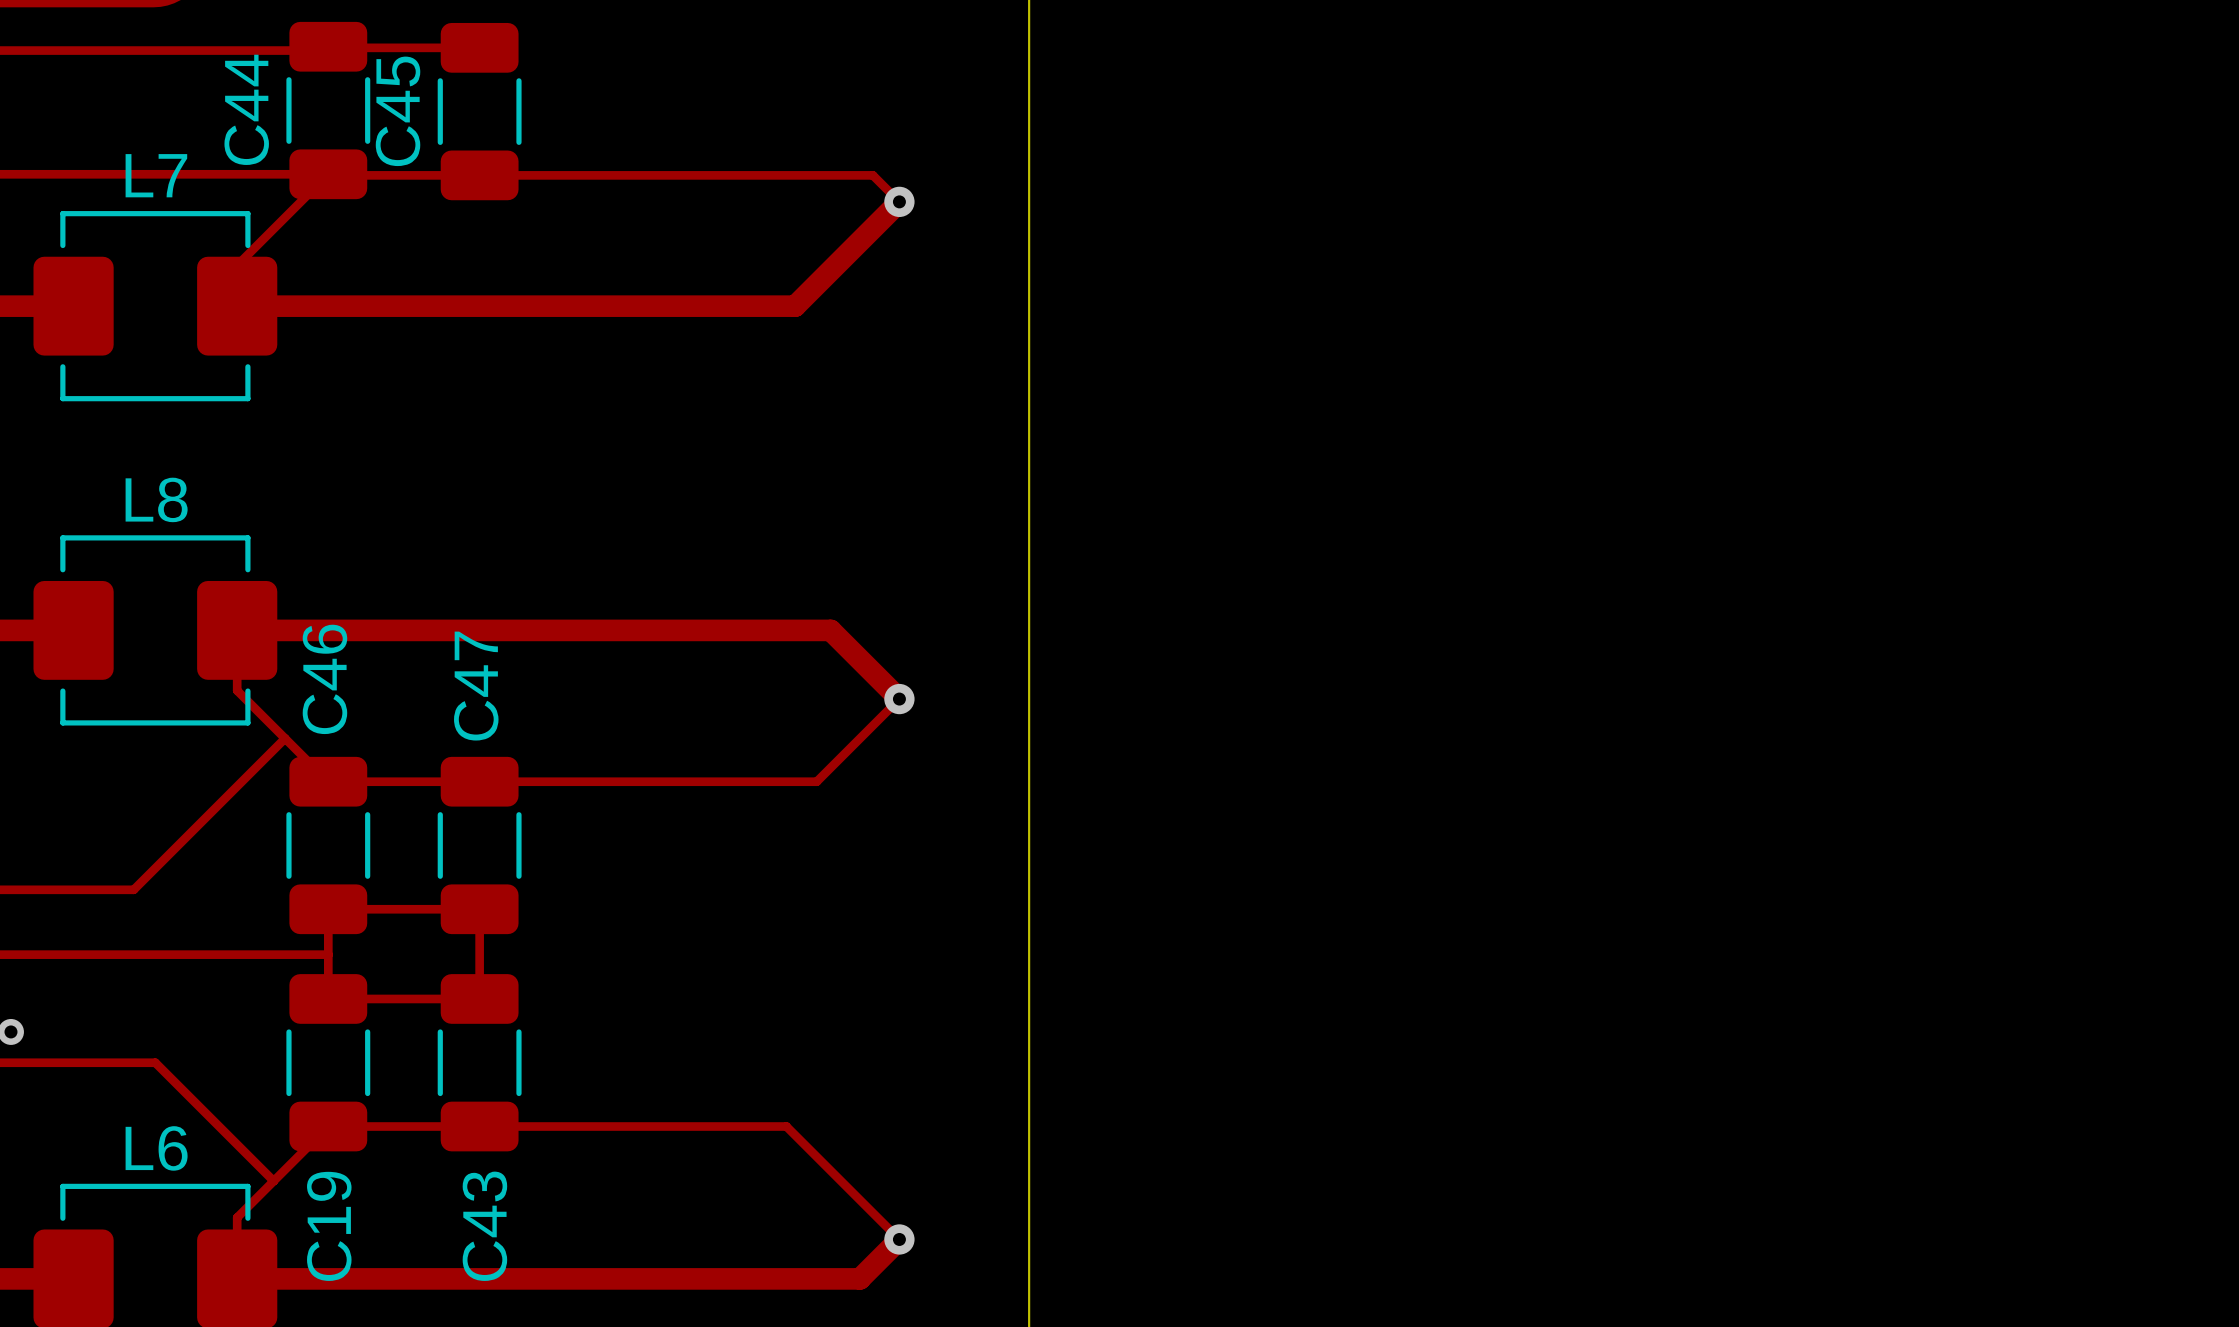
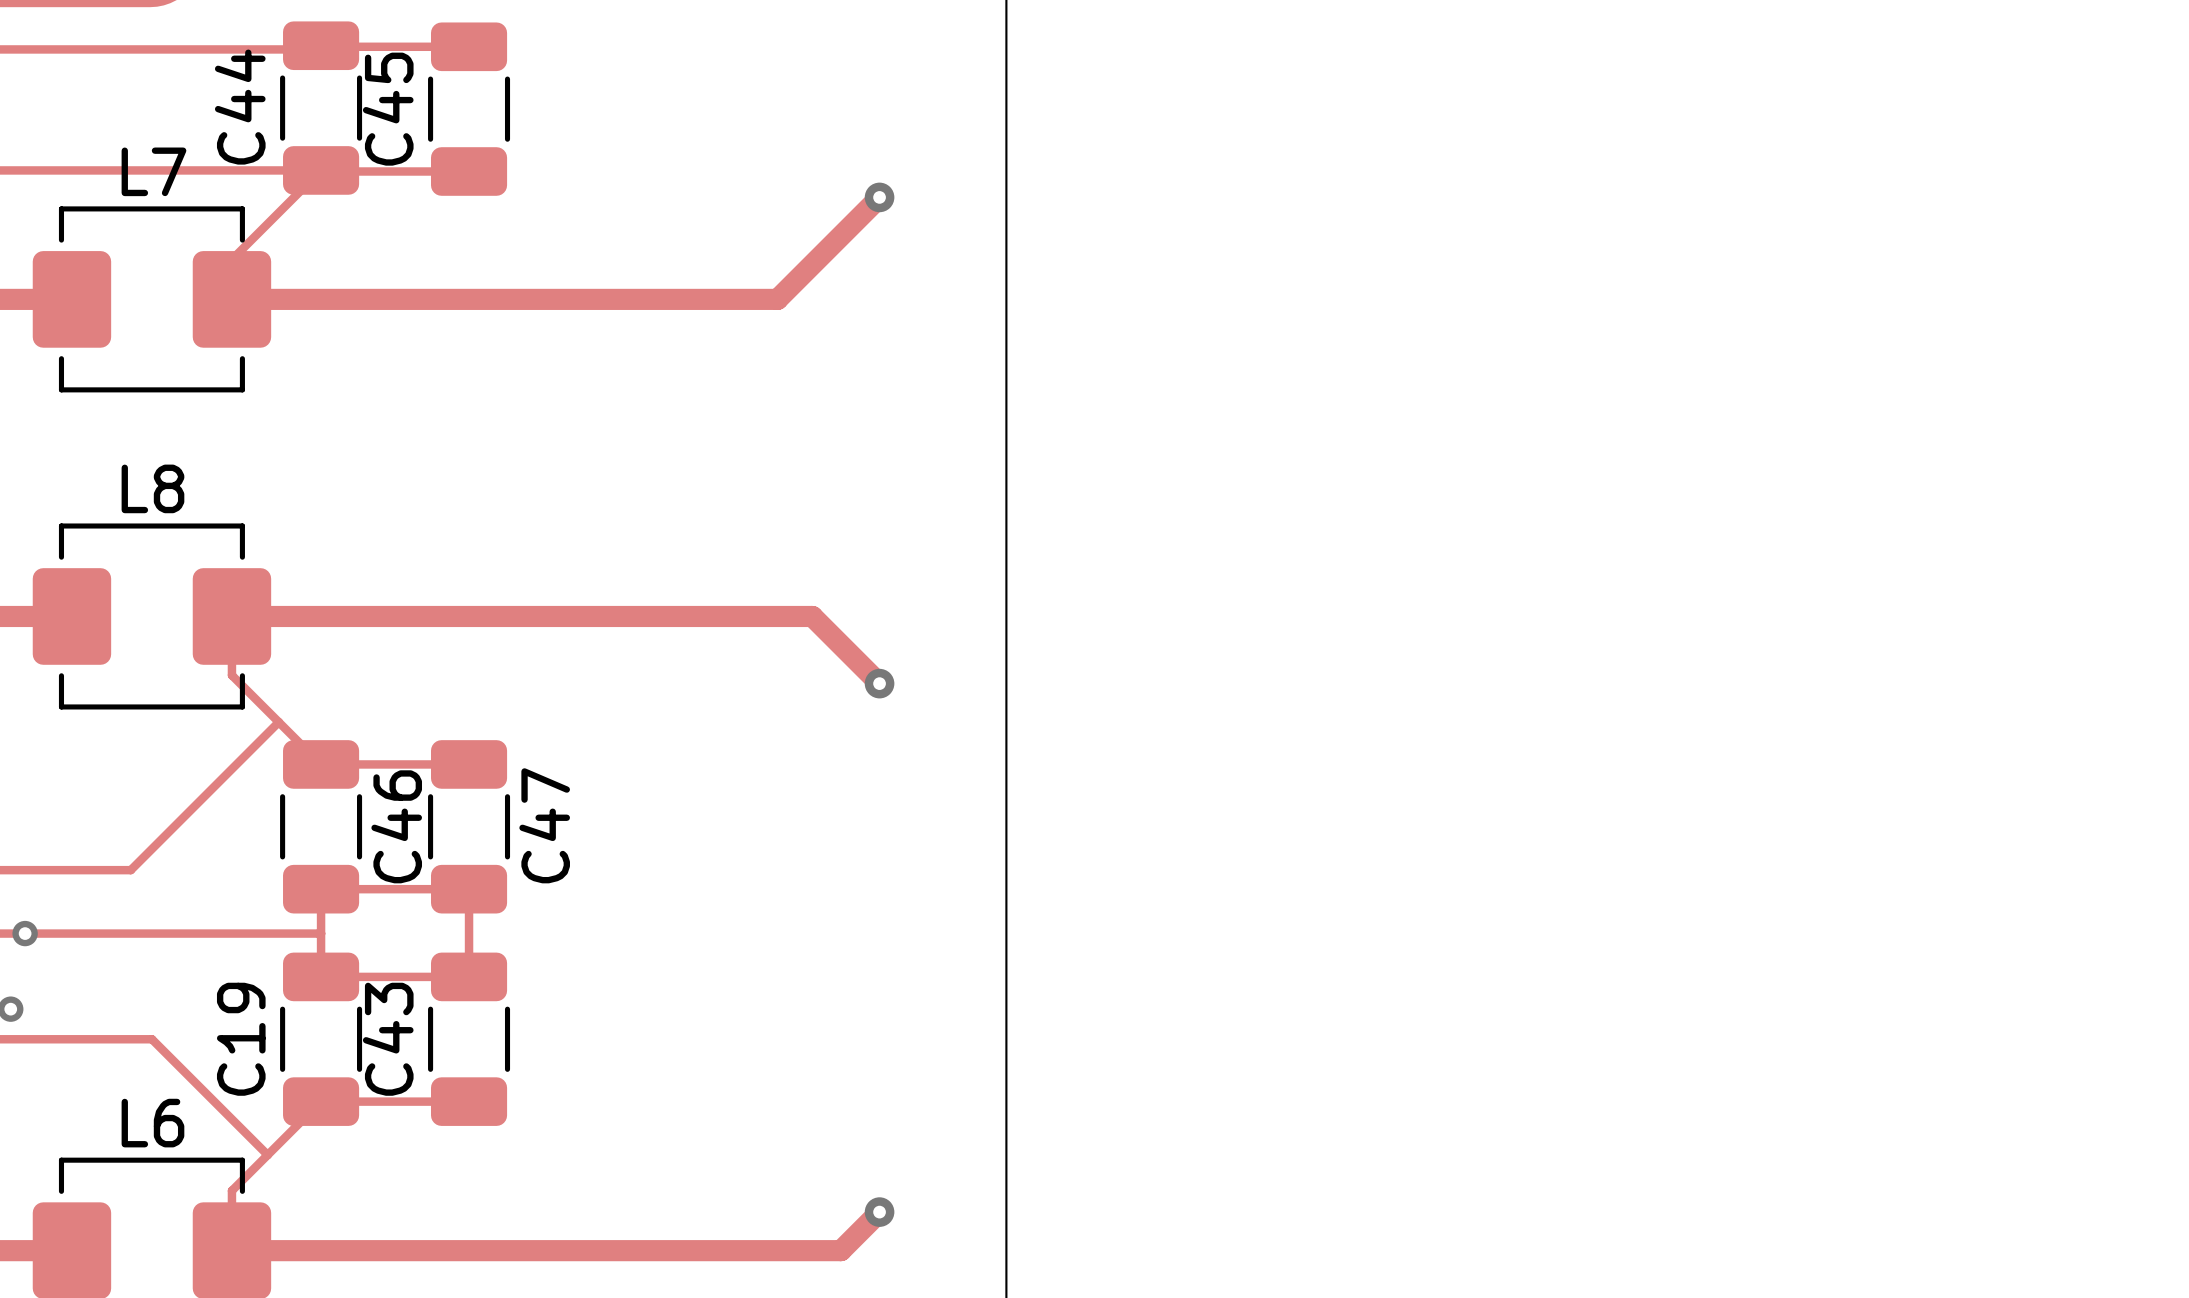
track: (485, 175) (872, 175) (899, 201) -> none
C46 name position: C46 (324, 679) -> C46 (396, 826)
C47 name position: C47 (476, 686) -> C47 (544, 825)
track: (899, 699) (816, 781) (479, 781) -> none
via: none -> (25, 933)
track: (479, 1126) (786, 1126) (899, 1239) -> none
C19 name position: C19 (329, 1226) -> C19 (241, 1039)
C43 name position: C43 (484, 1226) -> C43 (388, 1039)

